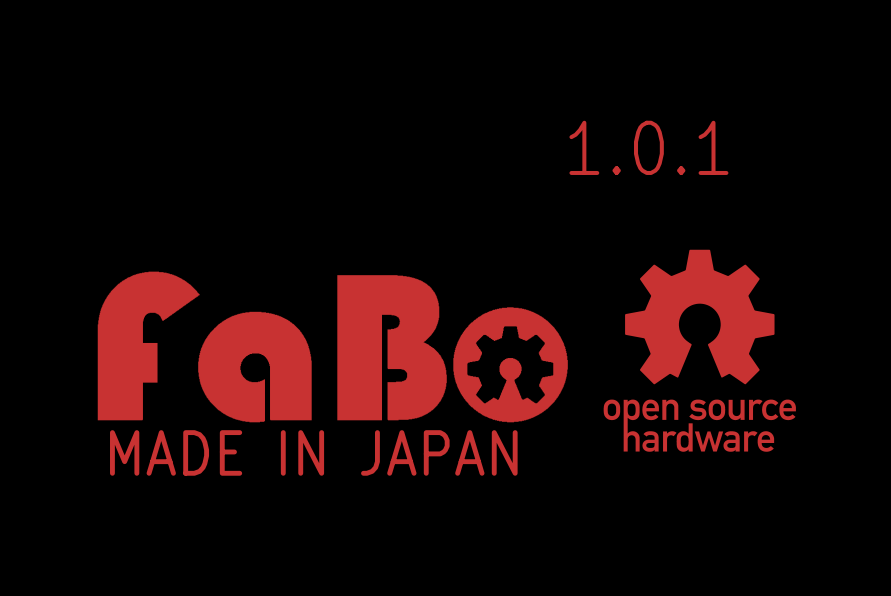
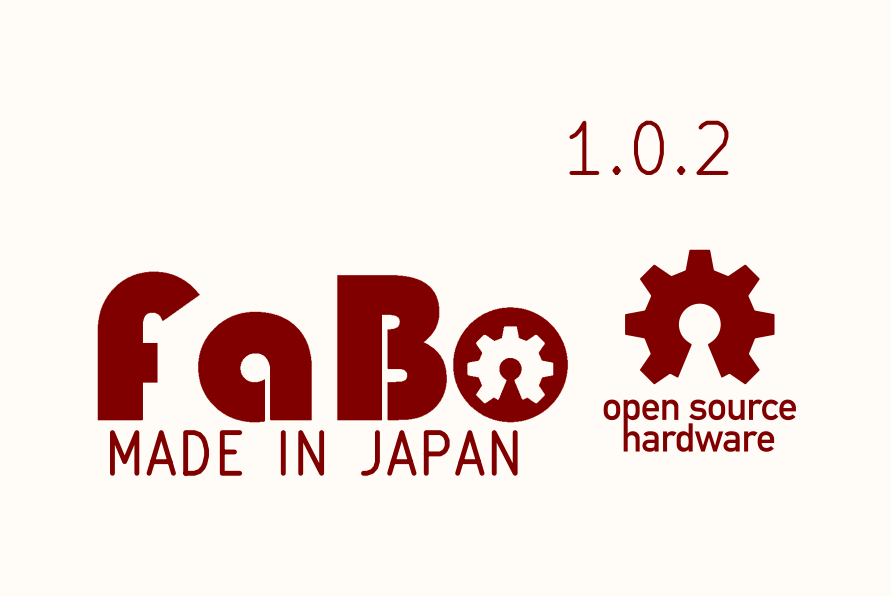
text: 1.0.1 (648, 147) -> 1.0.2 (648, 147)

